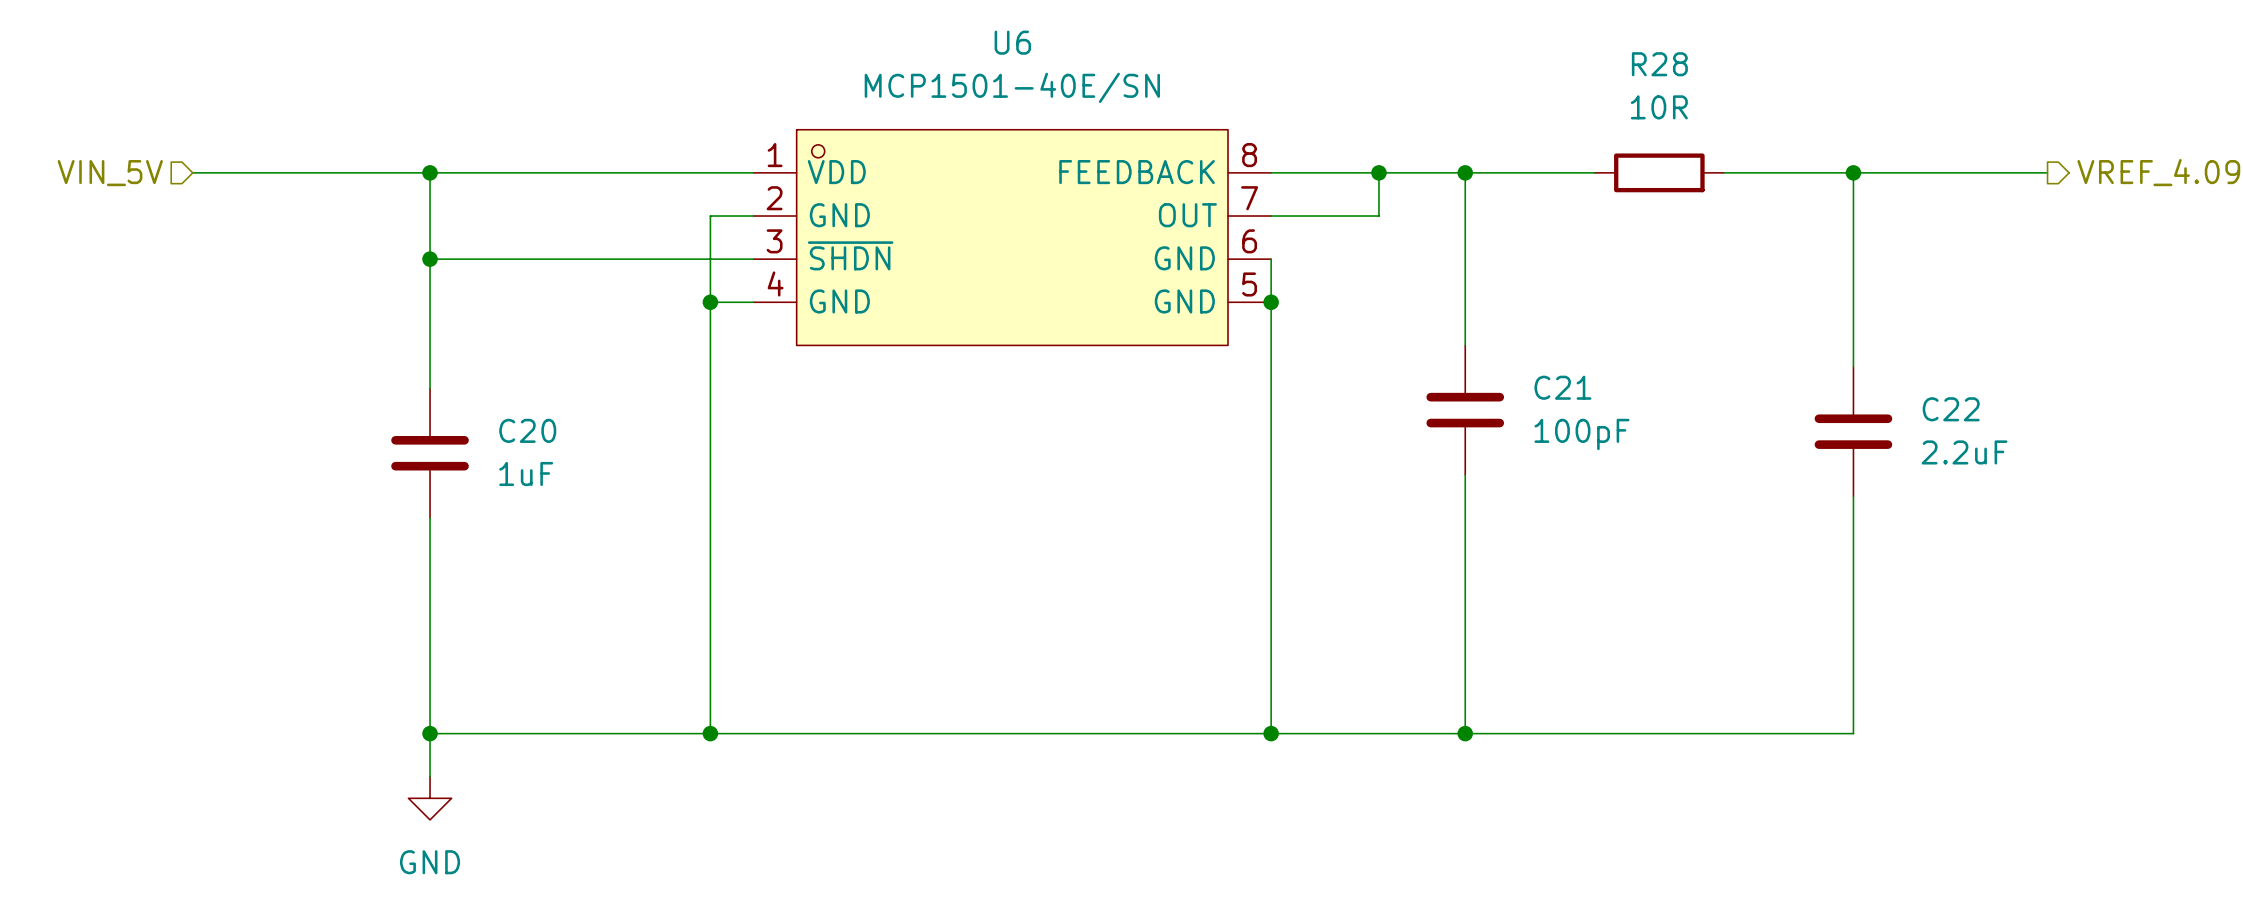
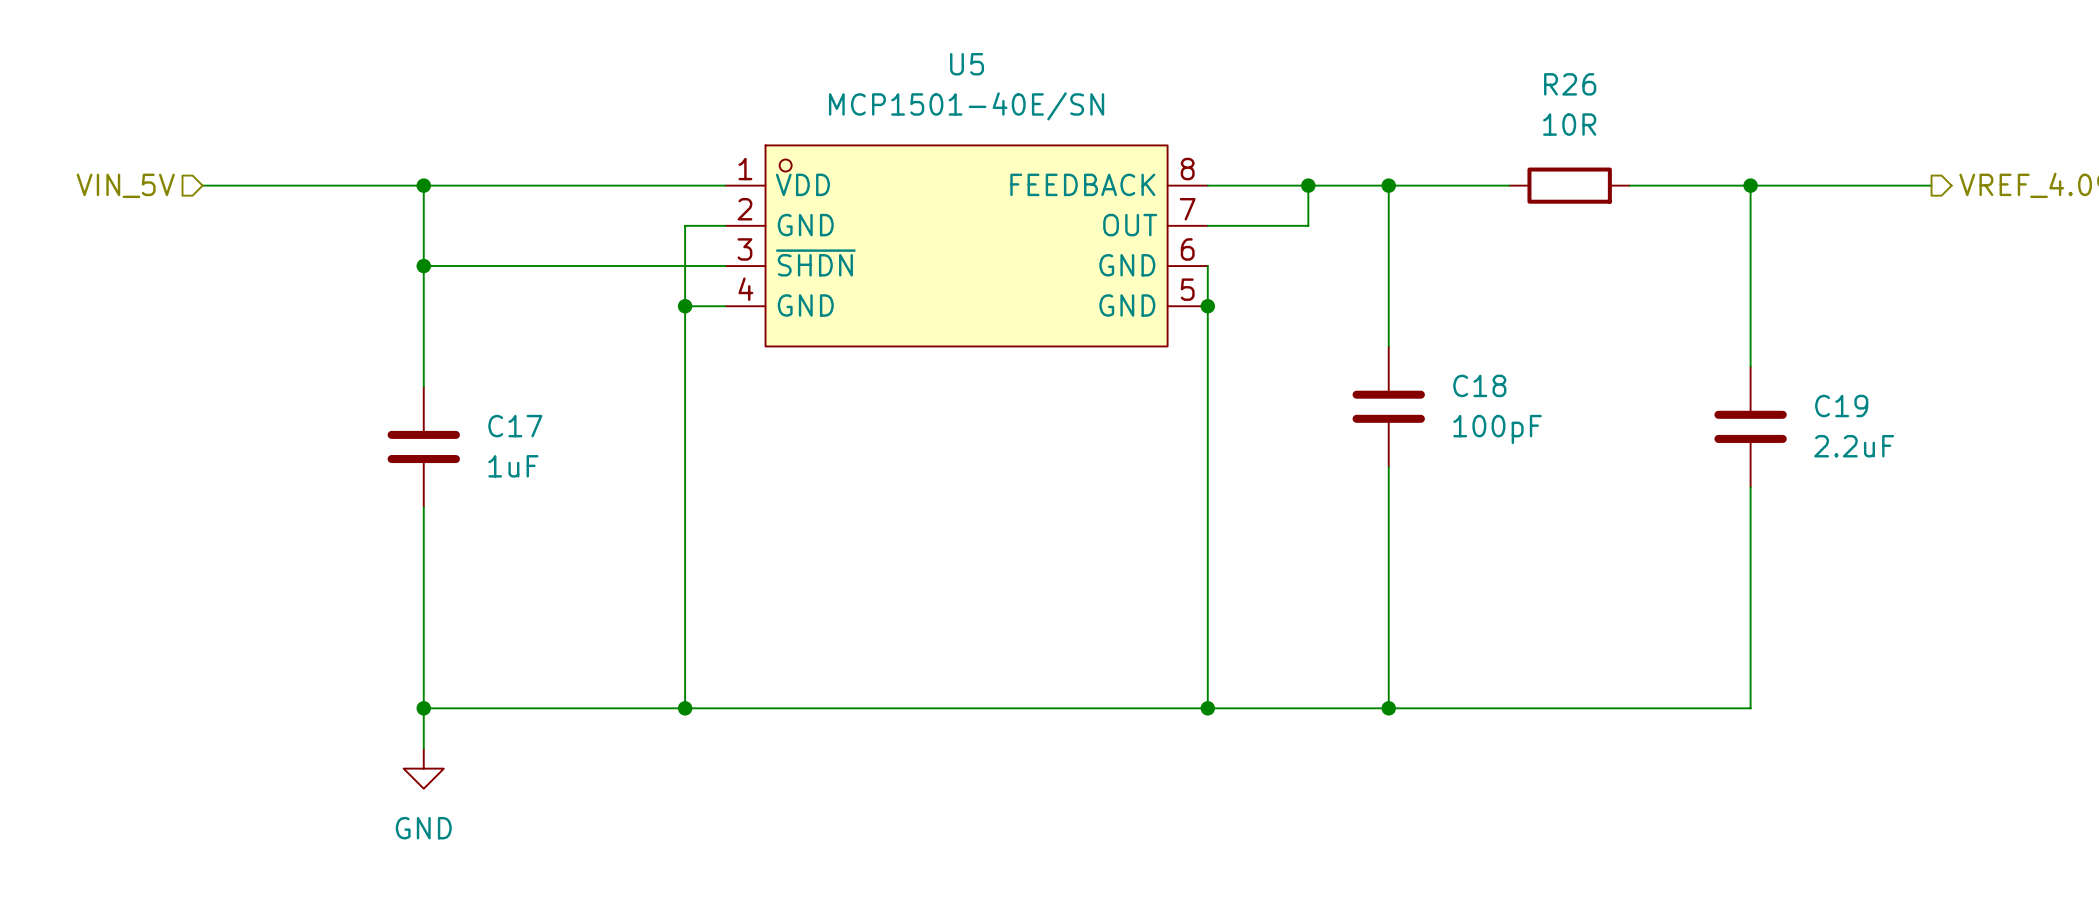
U6 name: U6 (1012, 42) -> U5 (967, 64)
R28 name: R28 (1659, 64) -> R26 (1570, 84)
C21 name: C21 (1562, 387) -> C18 (1479, 385)
C22 name: C22 (1951, 409) -> C19 (1841, 406)
C20 name: C20 (527, 430) -> C17 (515, 426)

